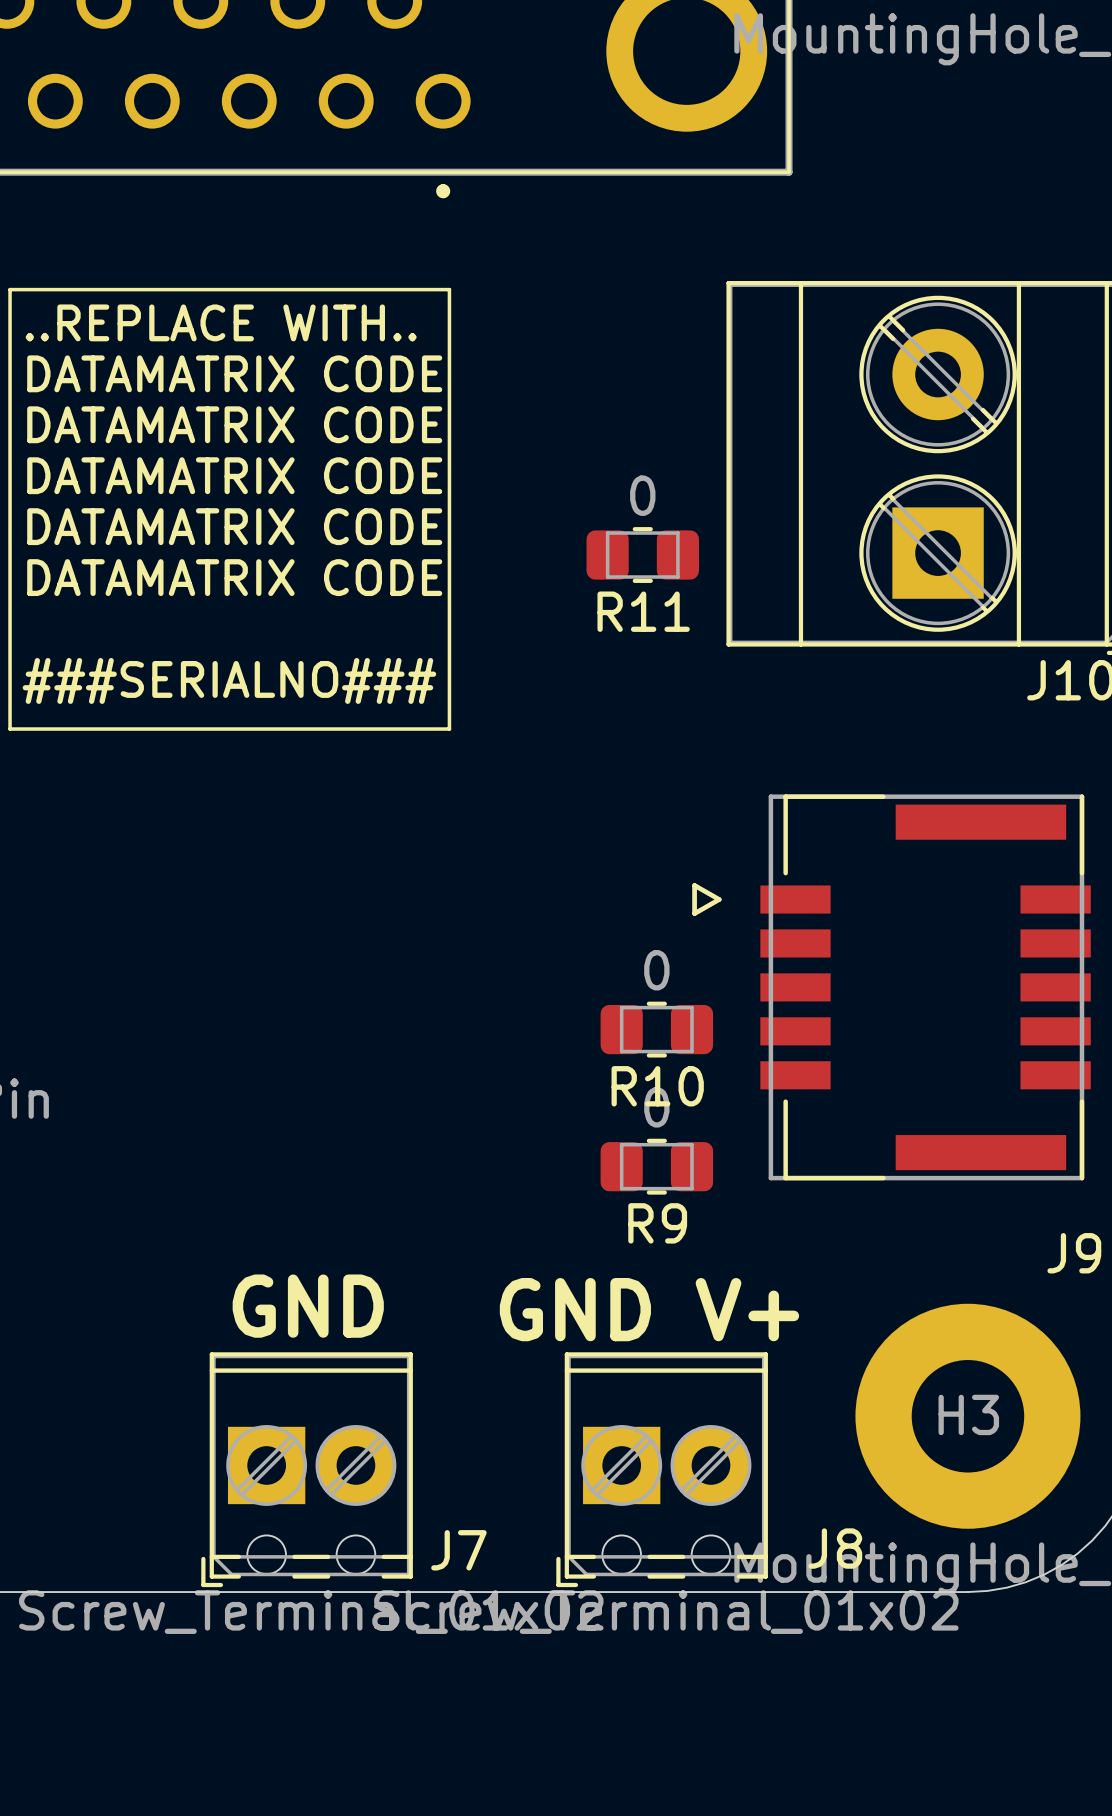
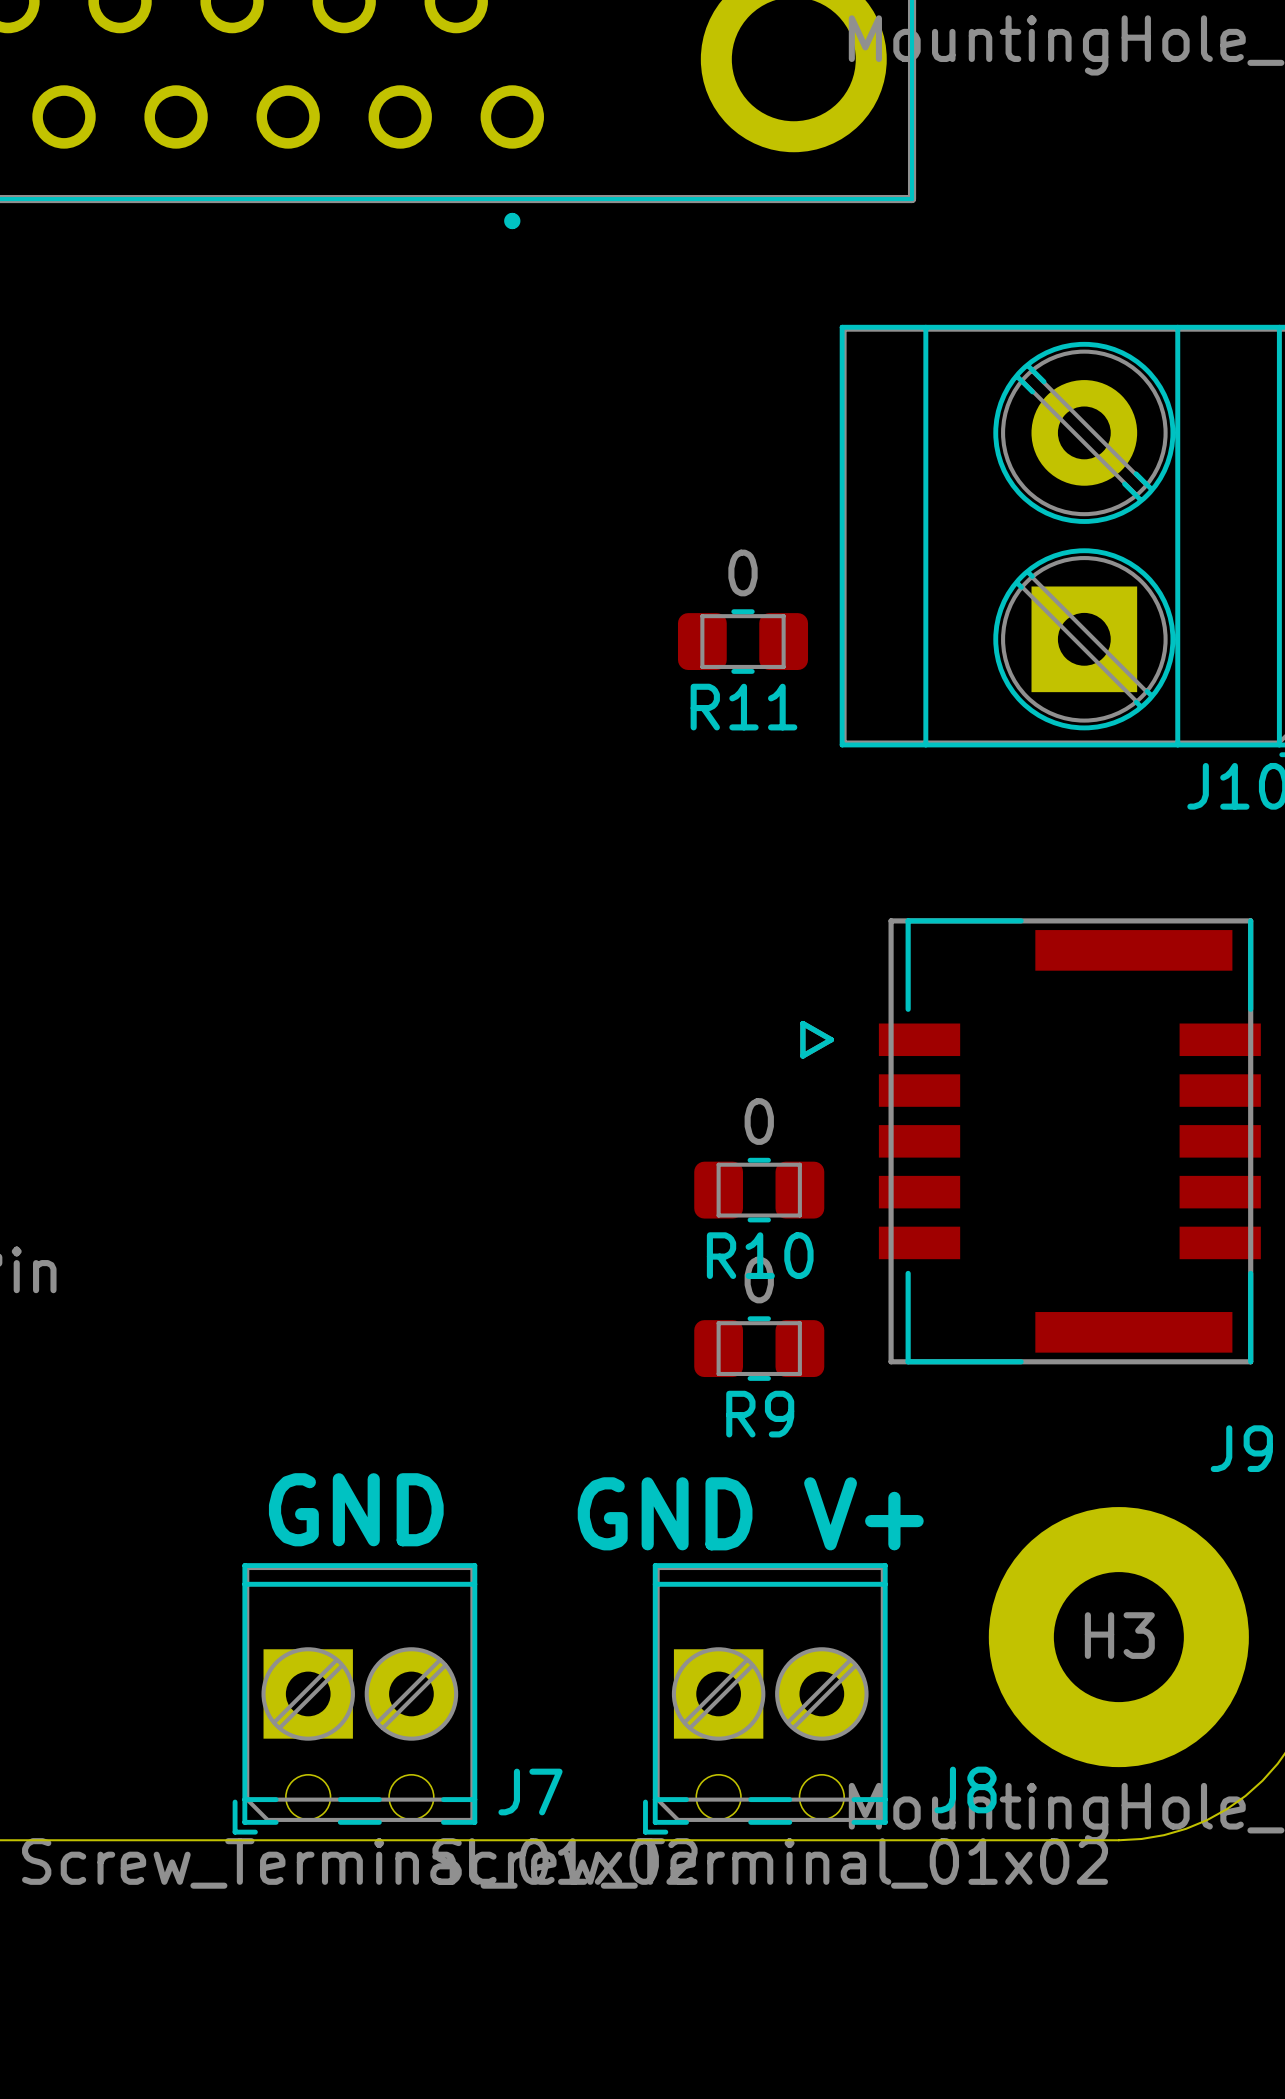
line: (10, 289) (10, 729) (449, 729) (449, 289) (10, 289) -> none
text: ..REPLACE WITH.. (221, 322) -> none
text: DATAMATRIX CODE (234, 373) -> none
text: DATAMATRIX CODE (234, 424) -> none
text: DATAMATRIX CODE (234, 475) -> none
text: DATAMATRIX CODE (234, 526) -> none
text: DATAMATRIX CODE (234, 577) -> none
text: ###SERIALNO### (229, 680) -> none

